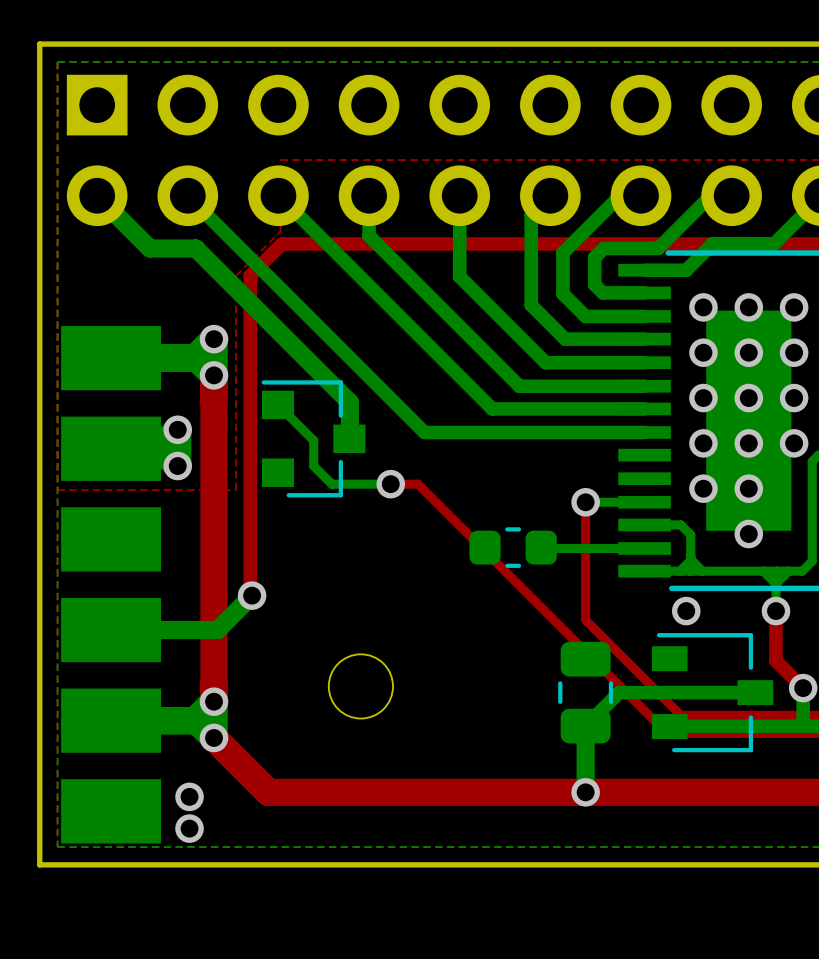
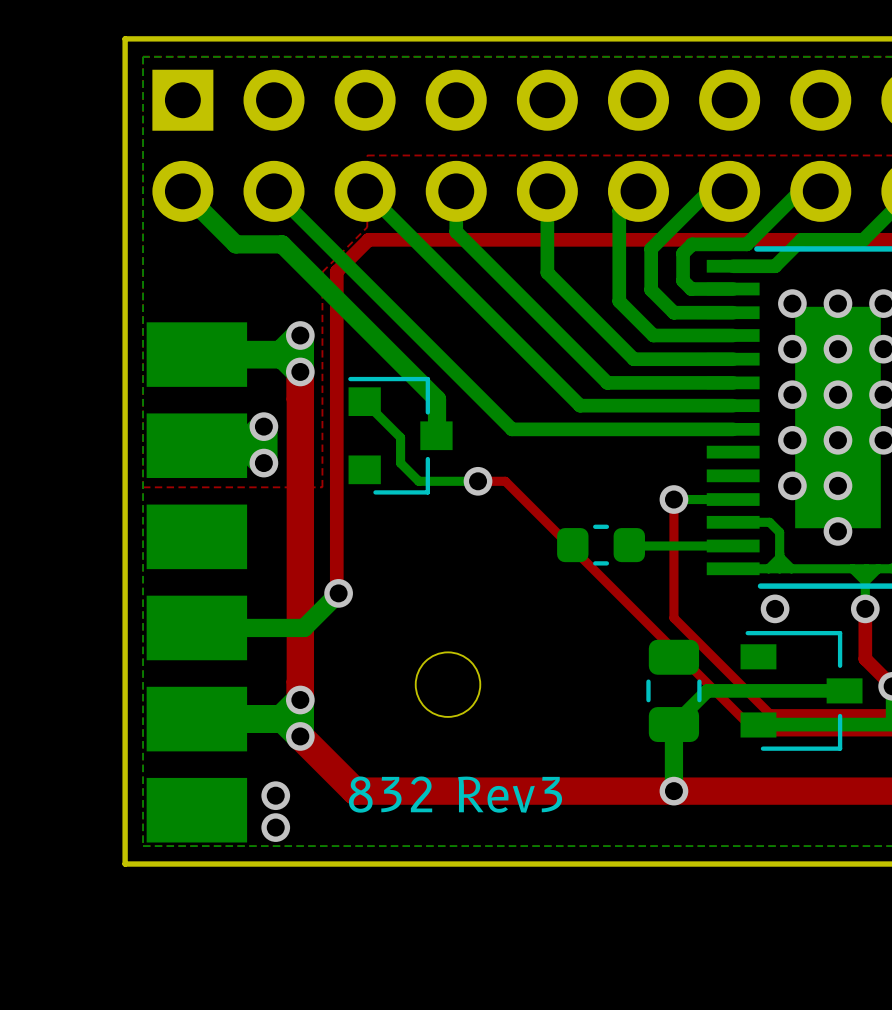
text: none -> 832 Rev3 (455, 794)

